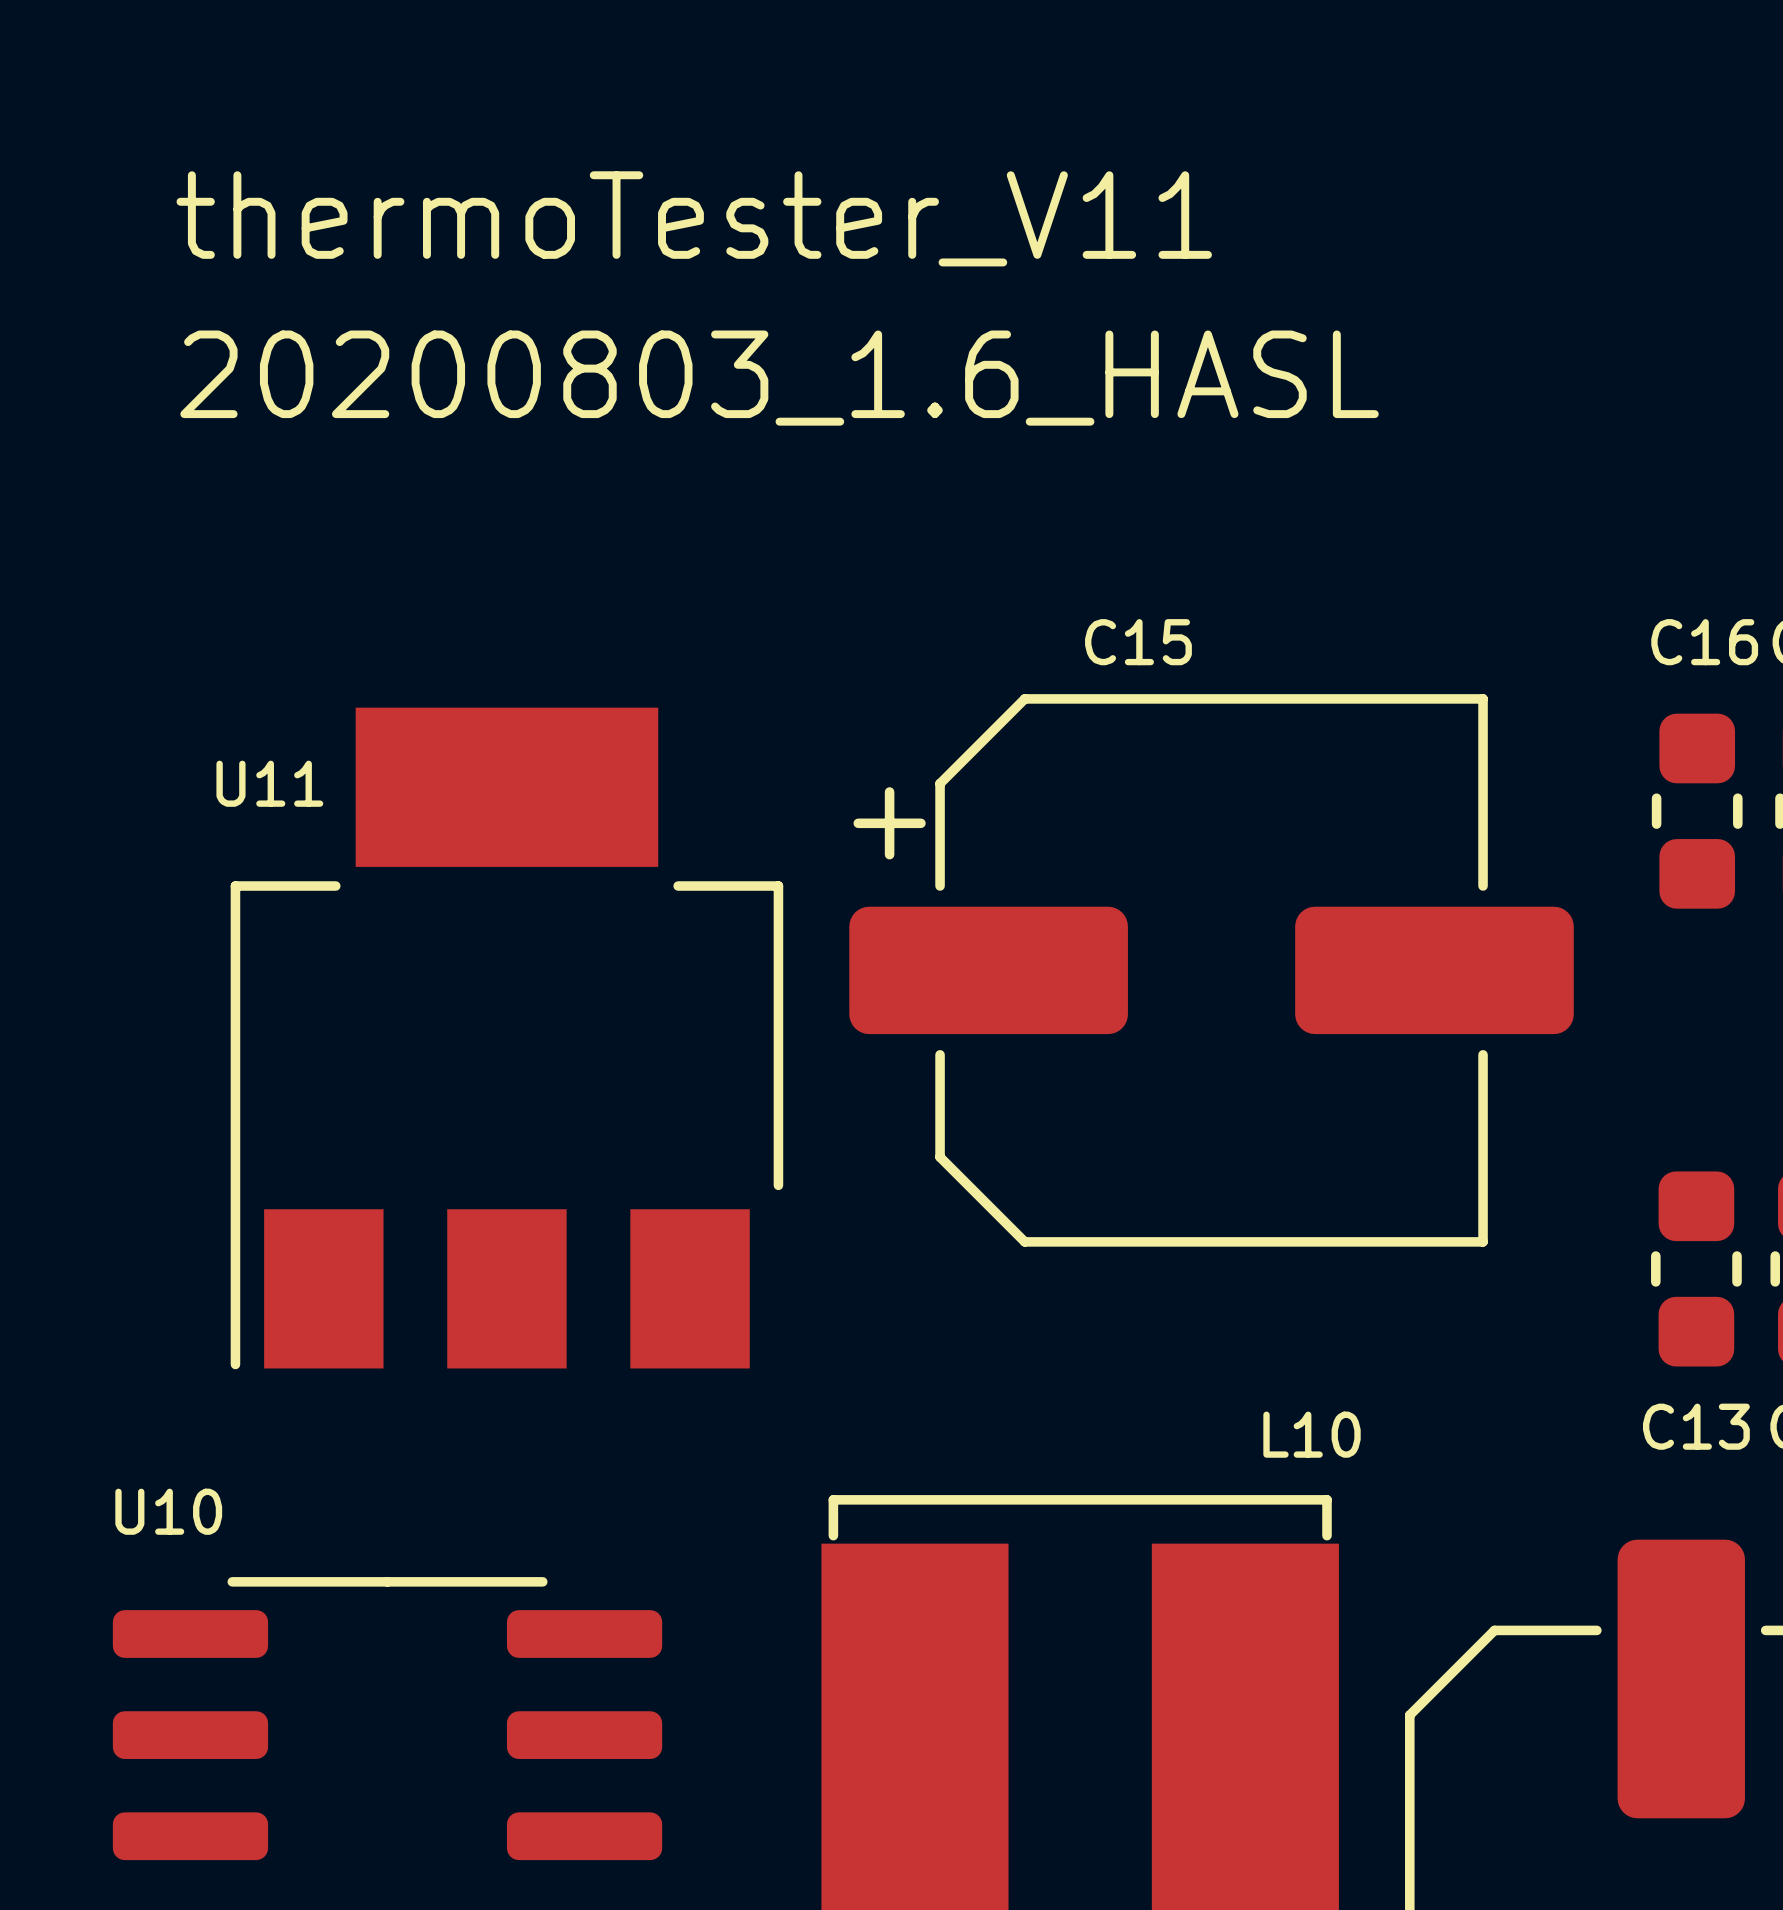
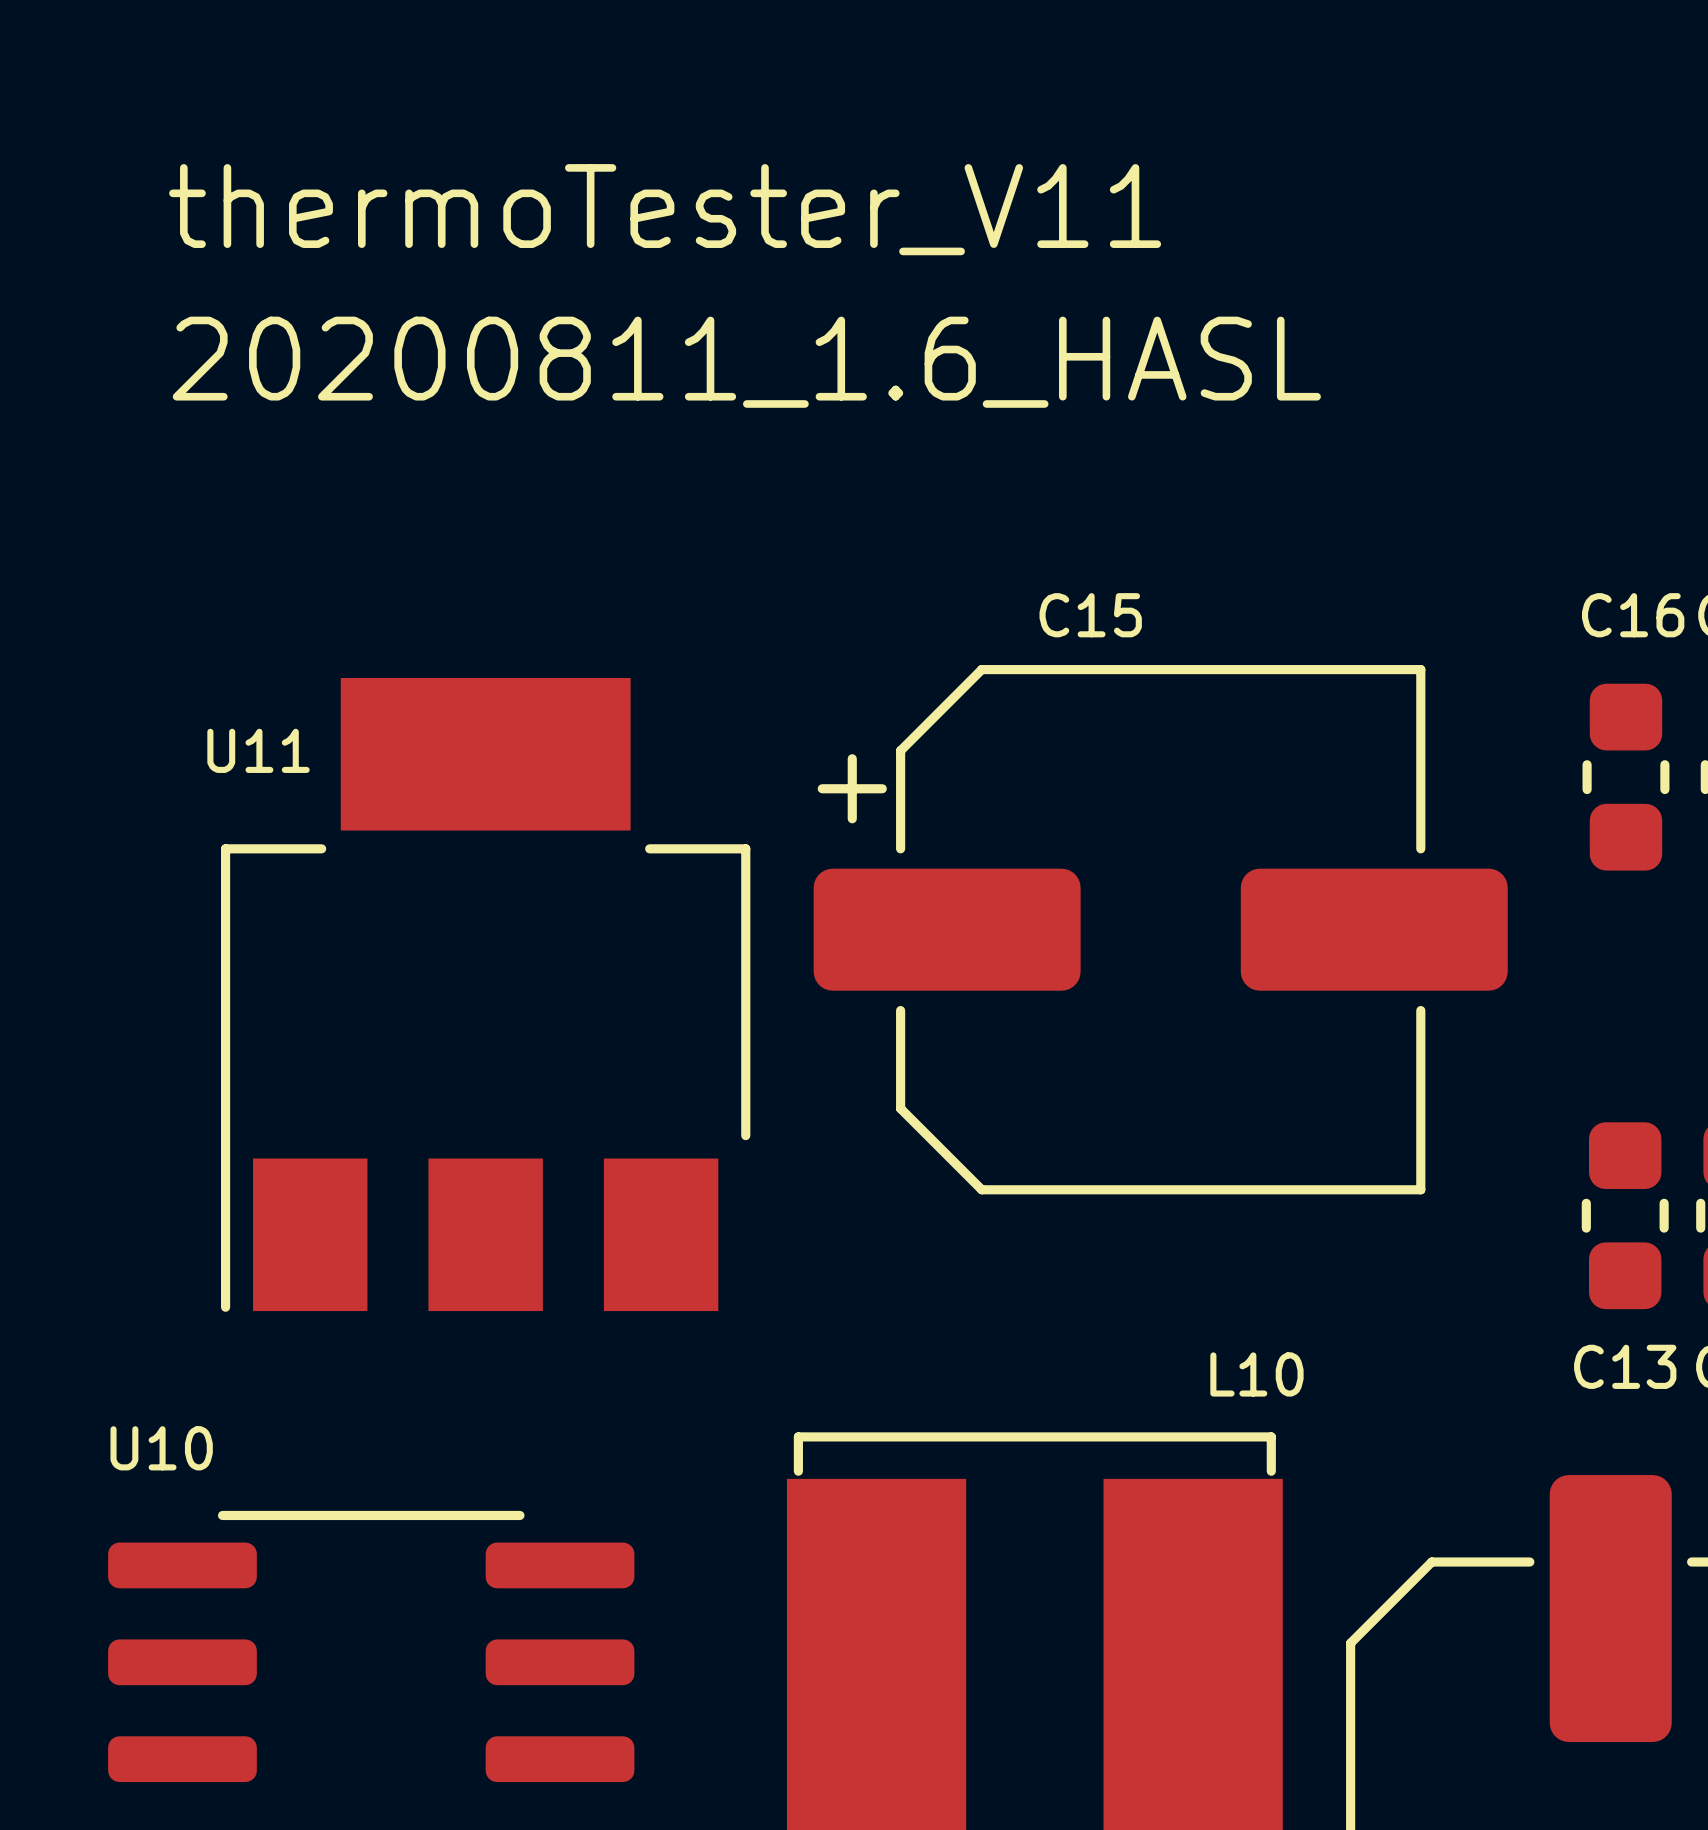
text: 20200803_1.6_HASL (779, 378) -> 20200811_1.6_HASL (746, 362)

